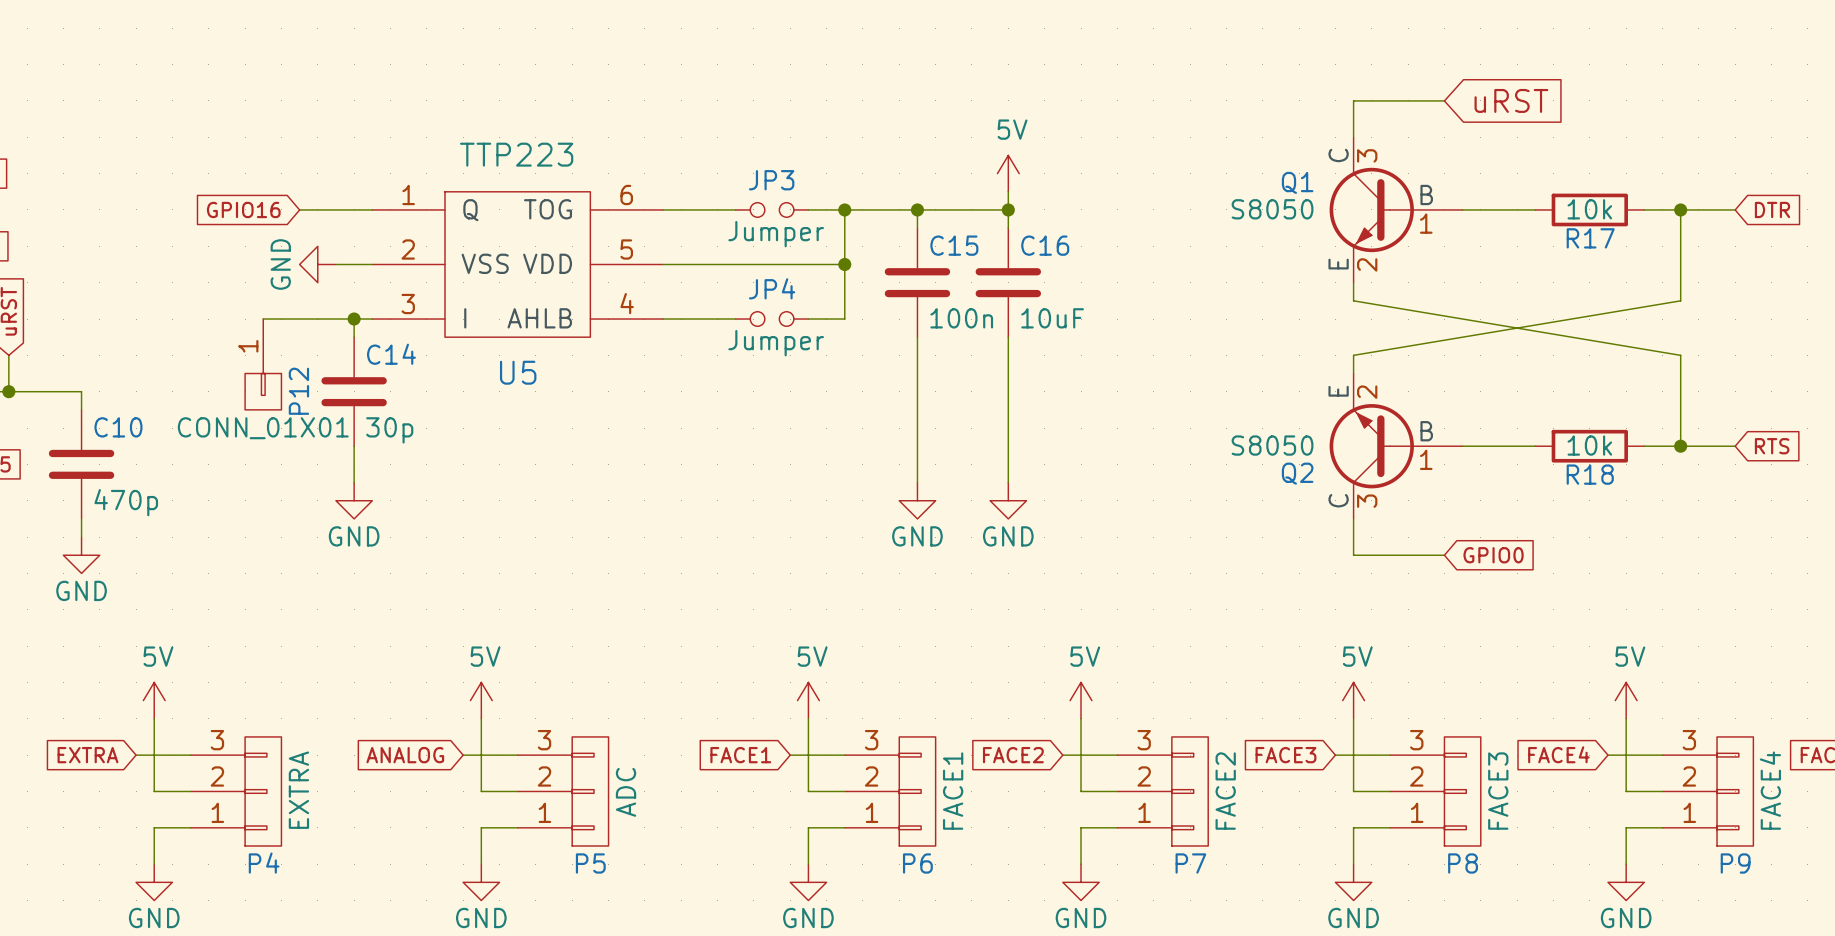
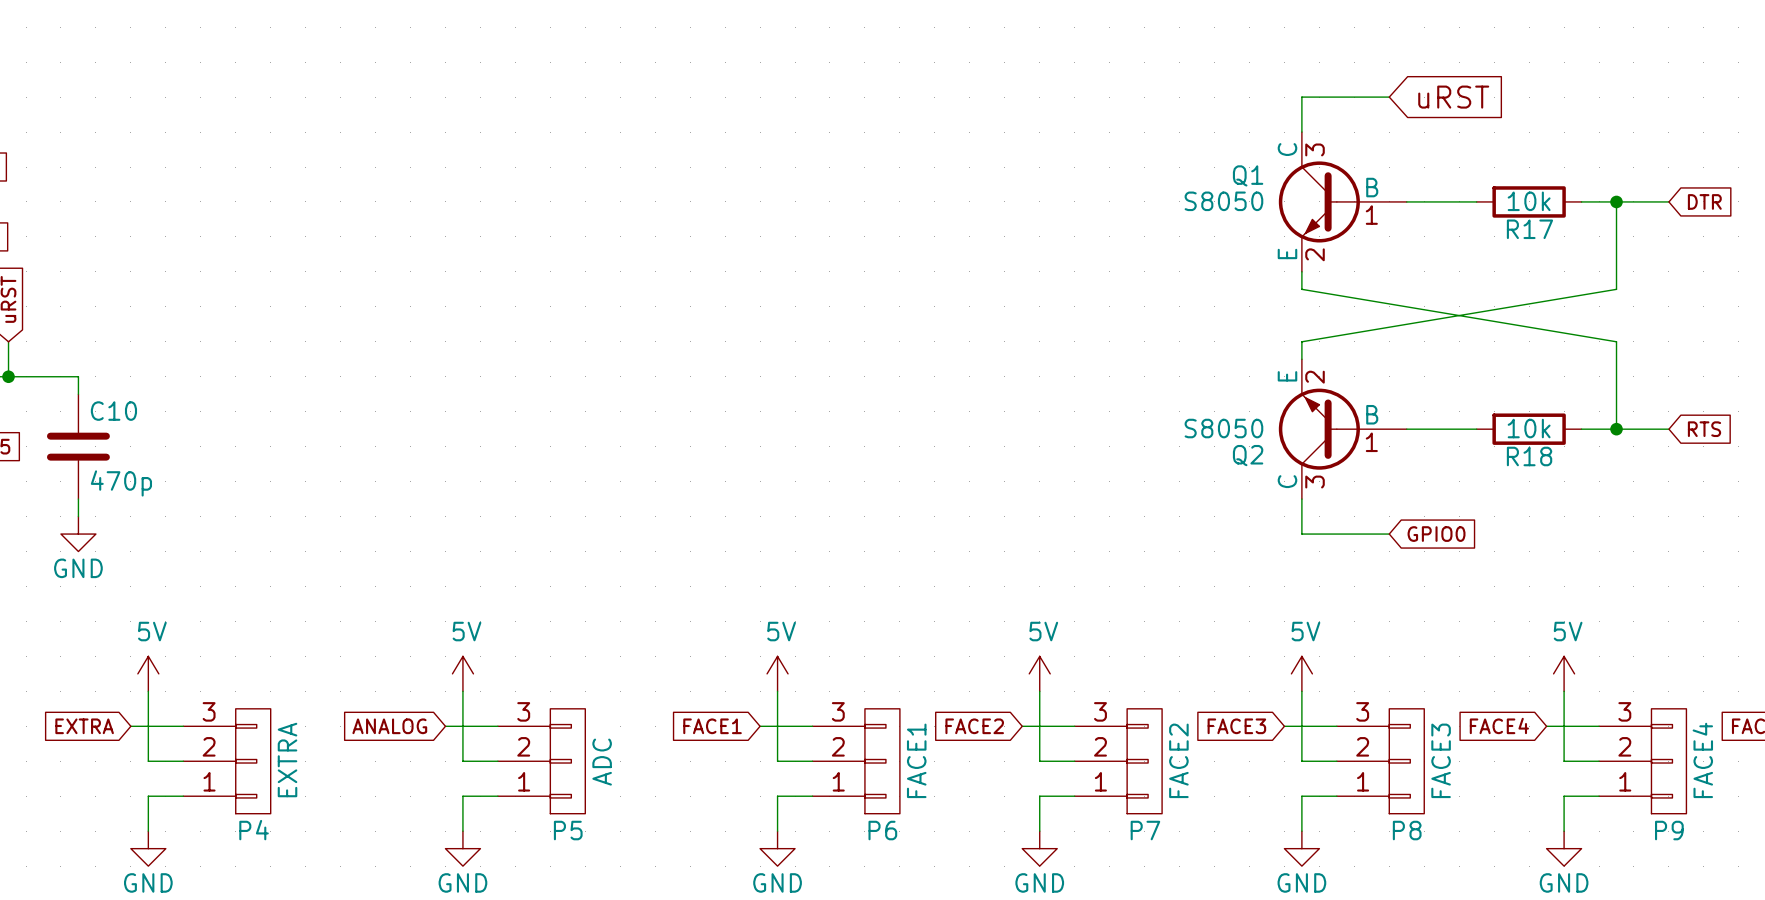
power symbol: 5V (1008, 173) -> none
wire: (1008, 191) (1008, 228) -> none
global label: GPIO16 (243, 209) -> none
wire: (299, 209) (372, 209) -> none
wire: (663, 209) (735, 209) -> none
JP3: Jumper (772, 209) -> none
wire: (808, 209) (1008, 209) -> none
wire: (844, 209) (844, 319) (808, 319) -> none
junction: (844, 209) -> none
wire: (917, 209) (917, 228) -> none
junction: (917, 209) -> none
junction: (1008, 209) -> none
power symbol: GND (317, 264) -> none
wire: (335, 264) (372, 264) -> none
U5: TTP223 (517, 264) -> none
wire: (663, 264) (844, 264) -> none
junction: (844, 264) -> none
C15: 100n (917, 282) -> none
C16: 10uF (1008, 282) -> none
wire: (263, 319) (372, 319) -> none
wire: (354, 319) (354, 337) -> none
junction: (354, 319) -> none
wire: (663, 319) (735, 319) -> none
JP4: Jumper (772, 319) -> none
wire: (917, 337) (917, 482) -> none
wire: (1008, 337) (1008, 482) -> none
P12: CONN_01X01 (263, 364) -> none
C14: 30p (354, 391) -> none
wire: (354, 446) (354, 482) -> none
power symbol: GND (354, 500) -> none
power symbol: GND (917, 500) -> none
power symbol: GND (1008, 500) -> none

